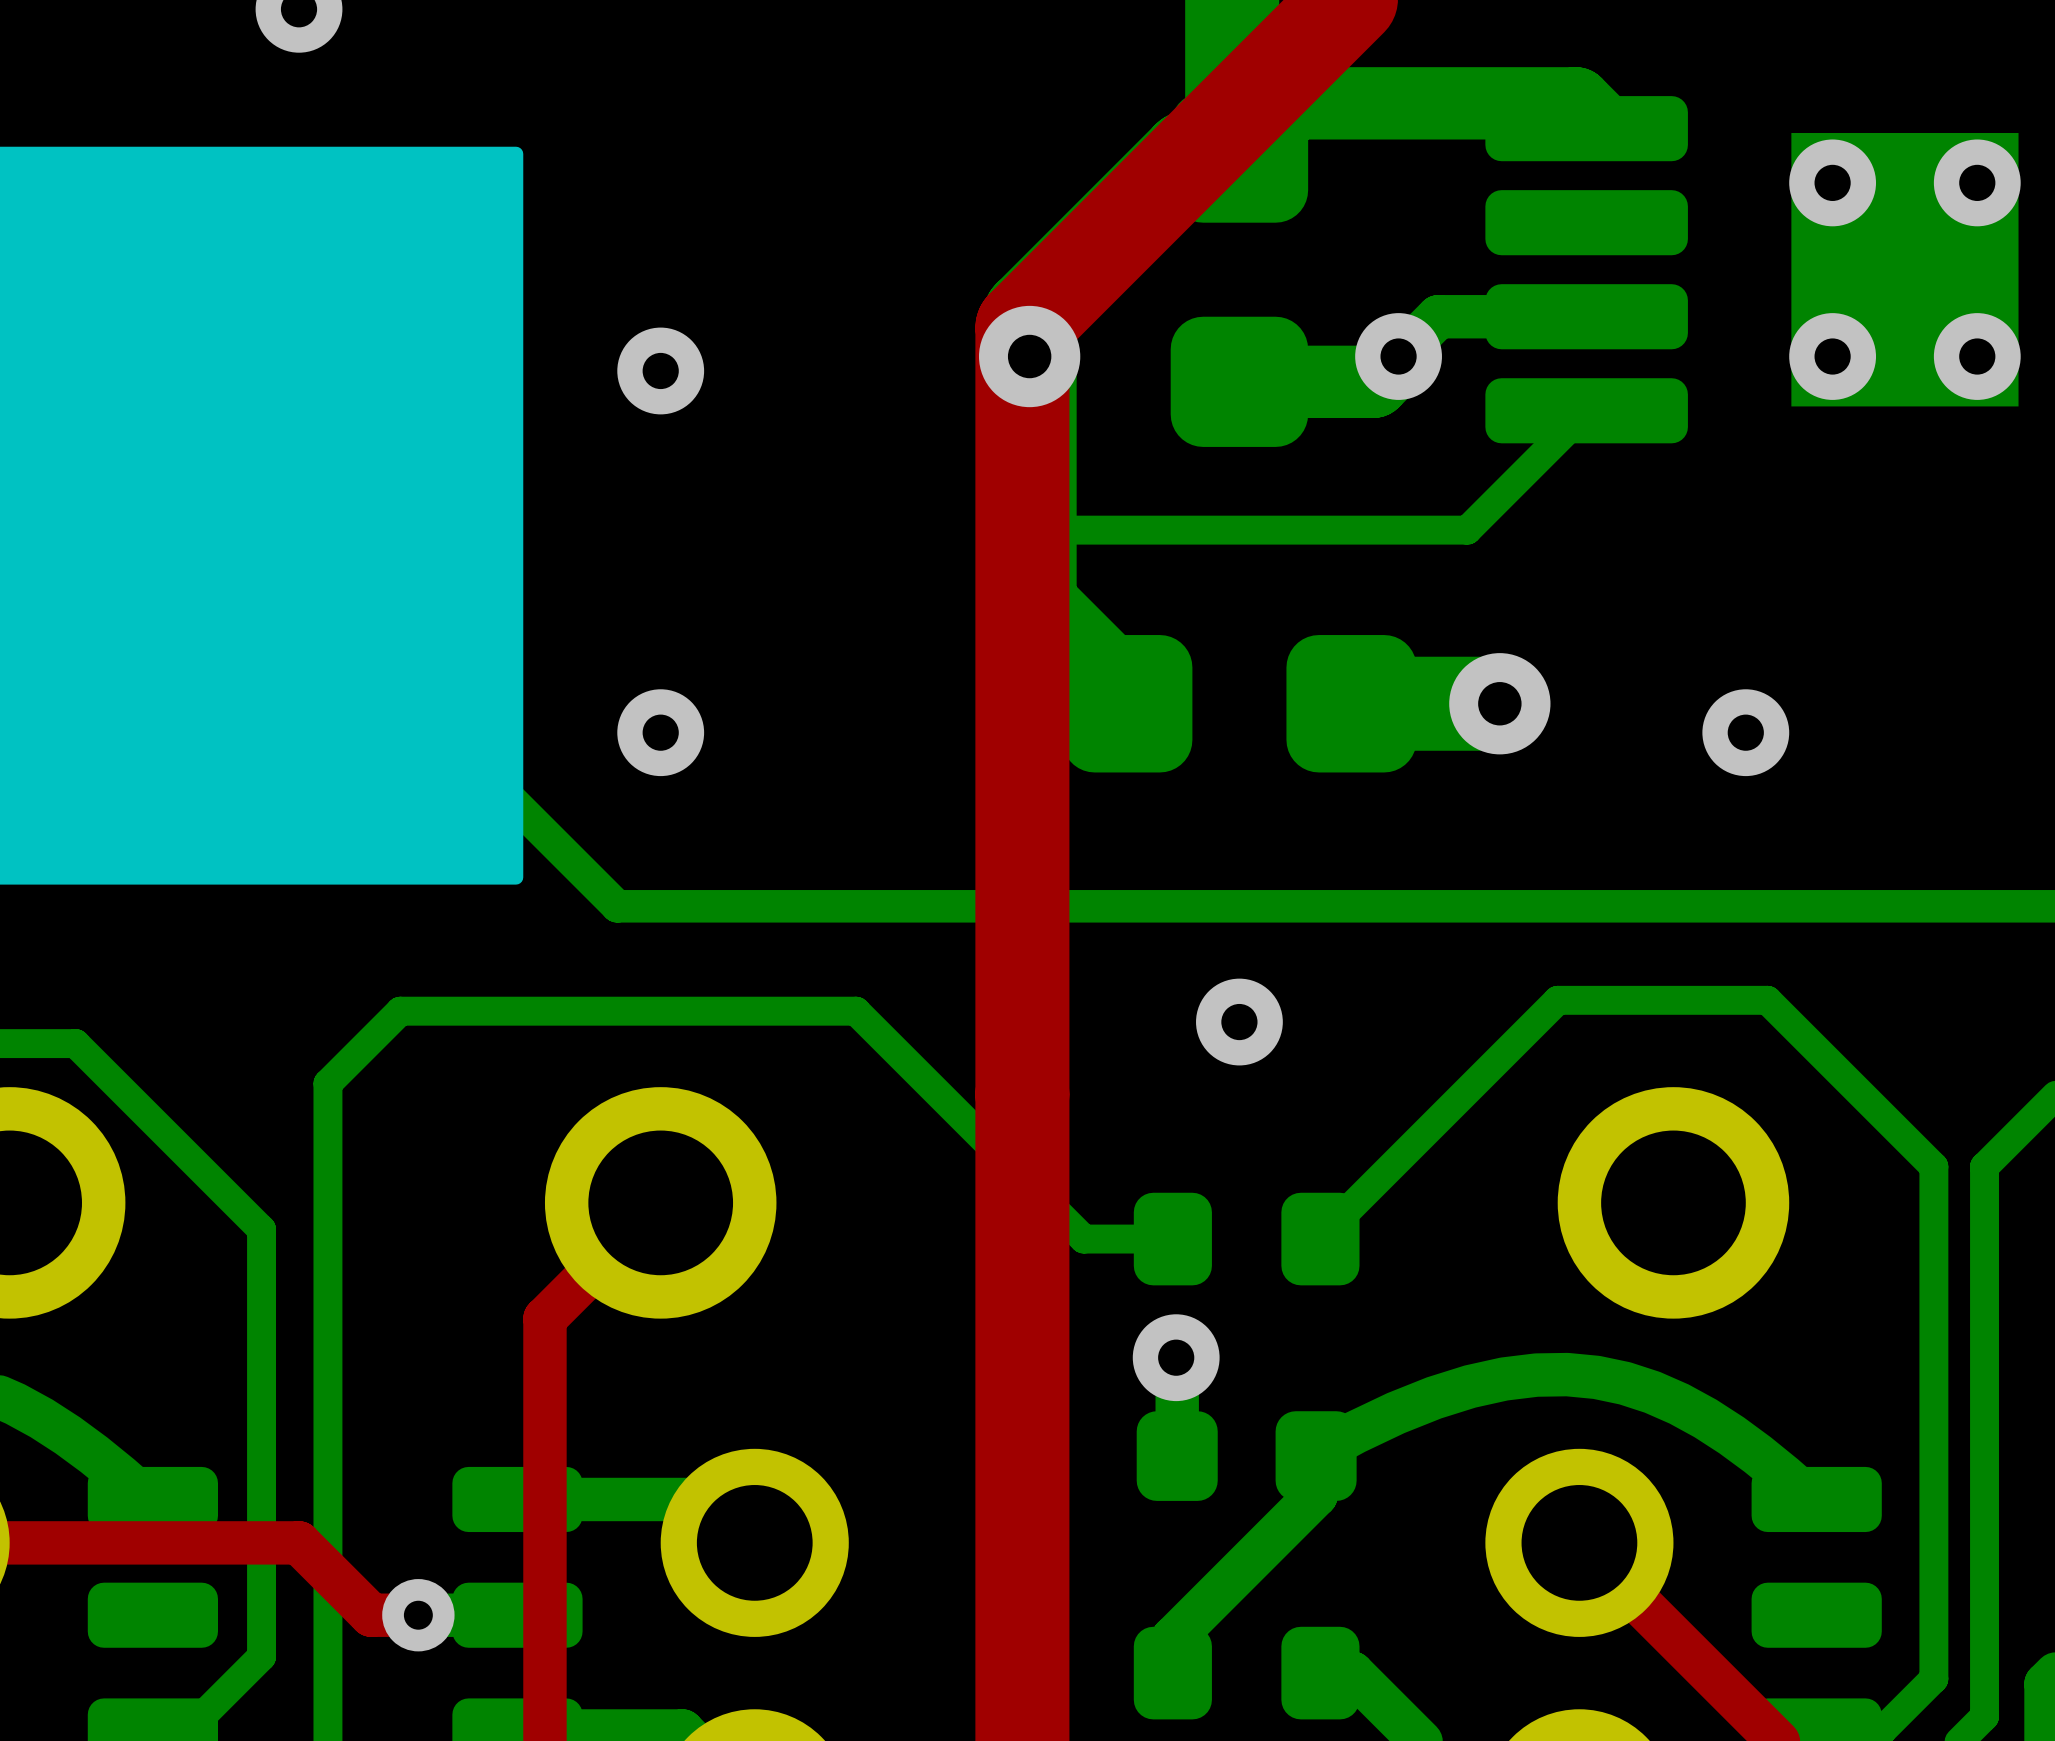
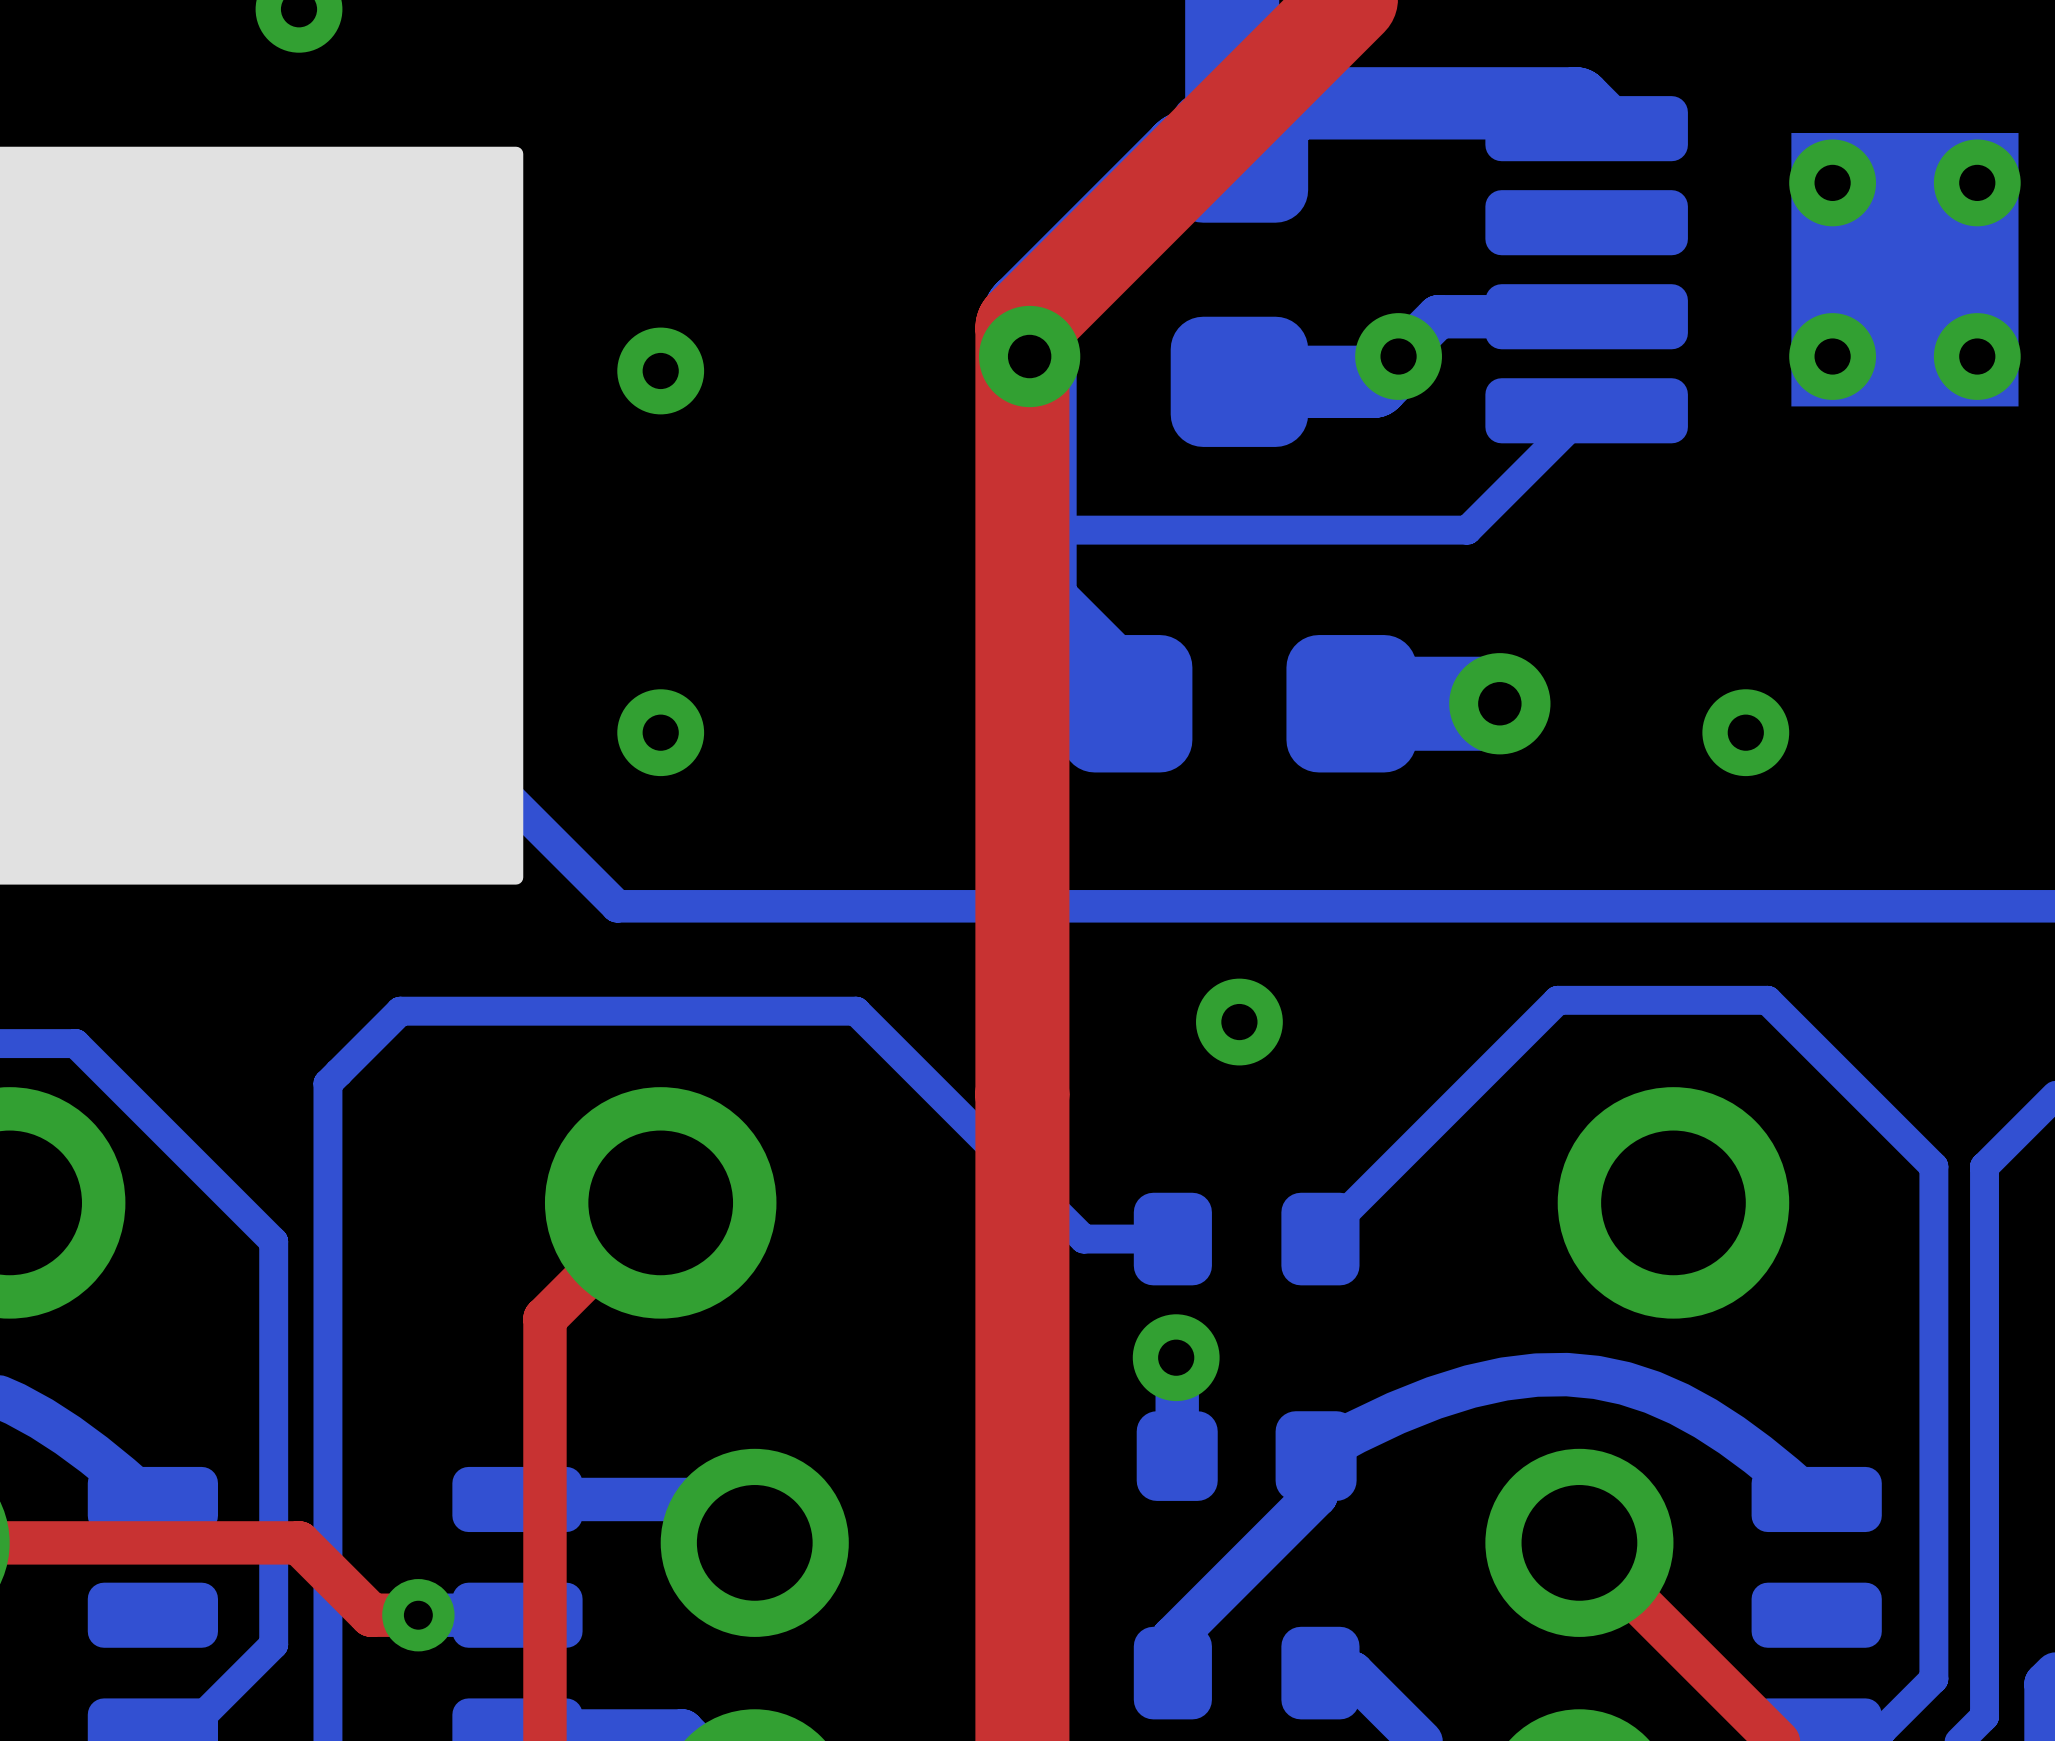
bottom track: (261, 1229) (261, 1656) -> (261, 1229) (273, 1241) (273, 1644) (261, 1656)

